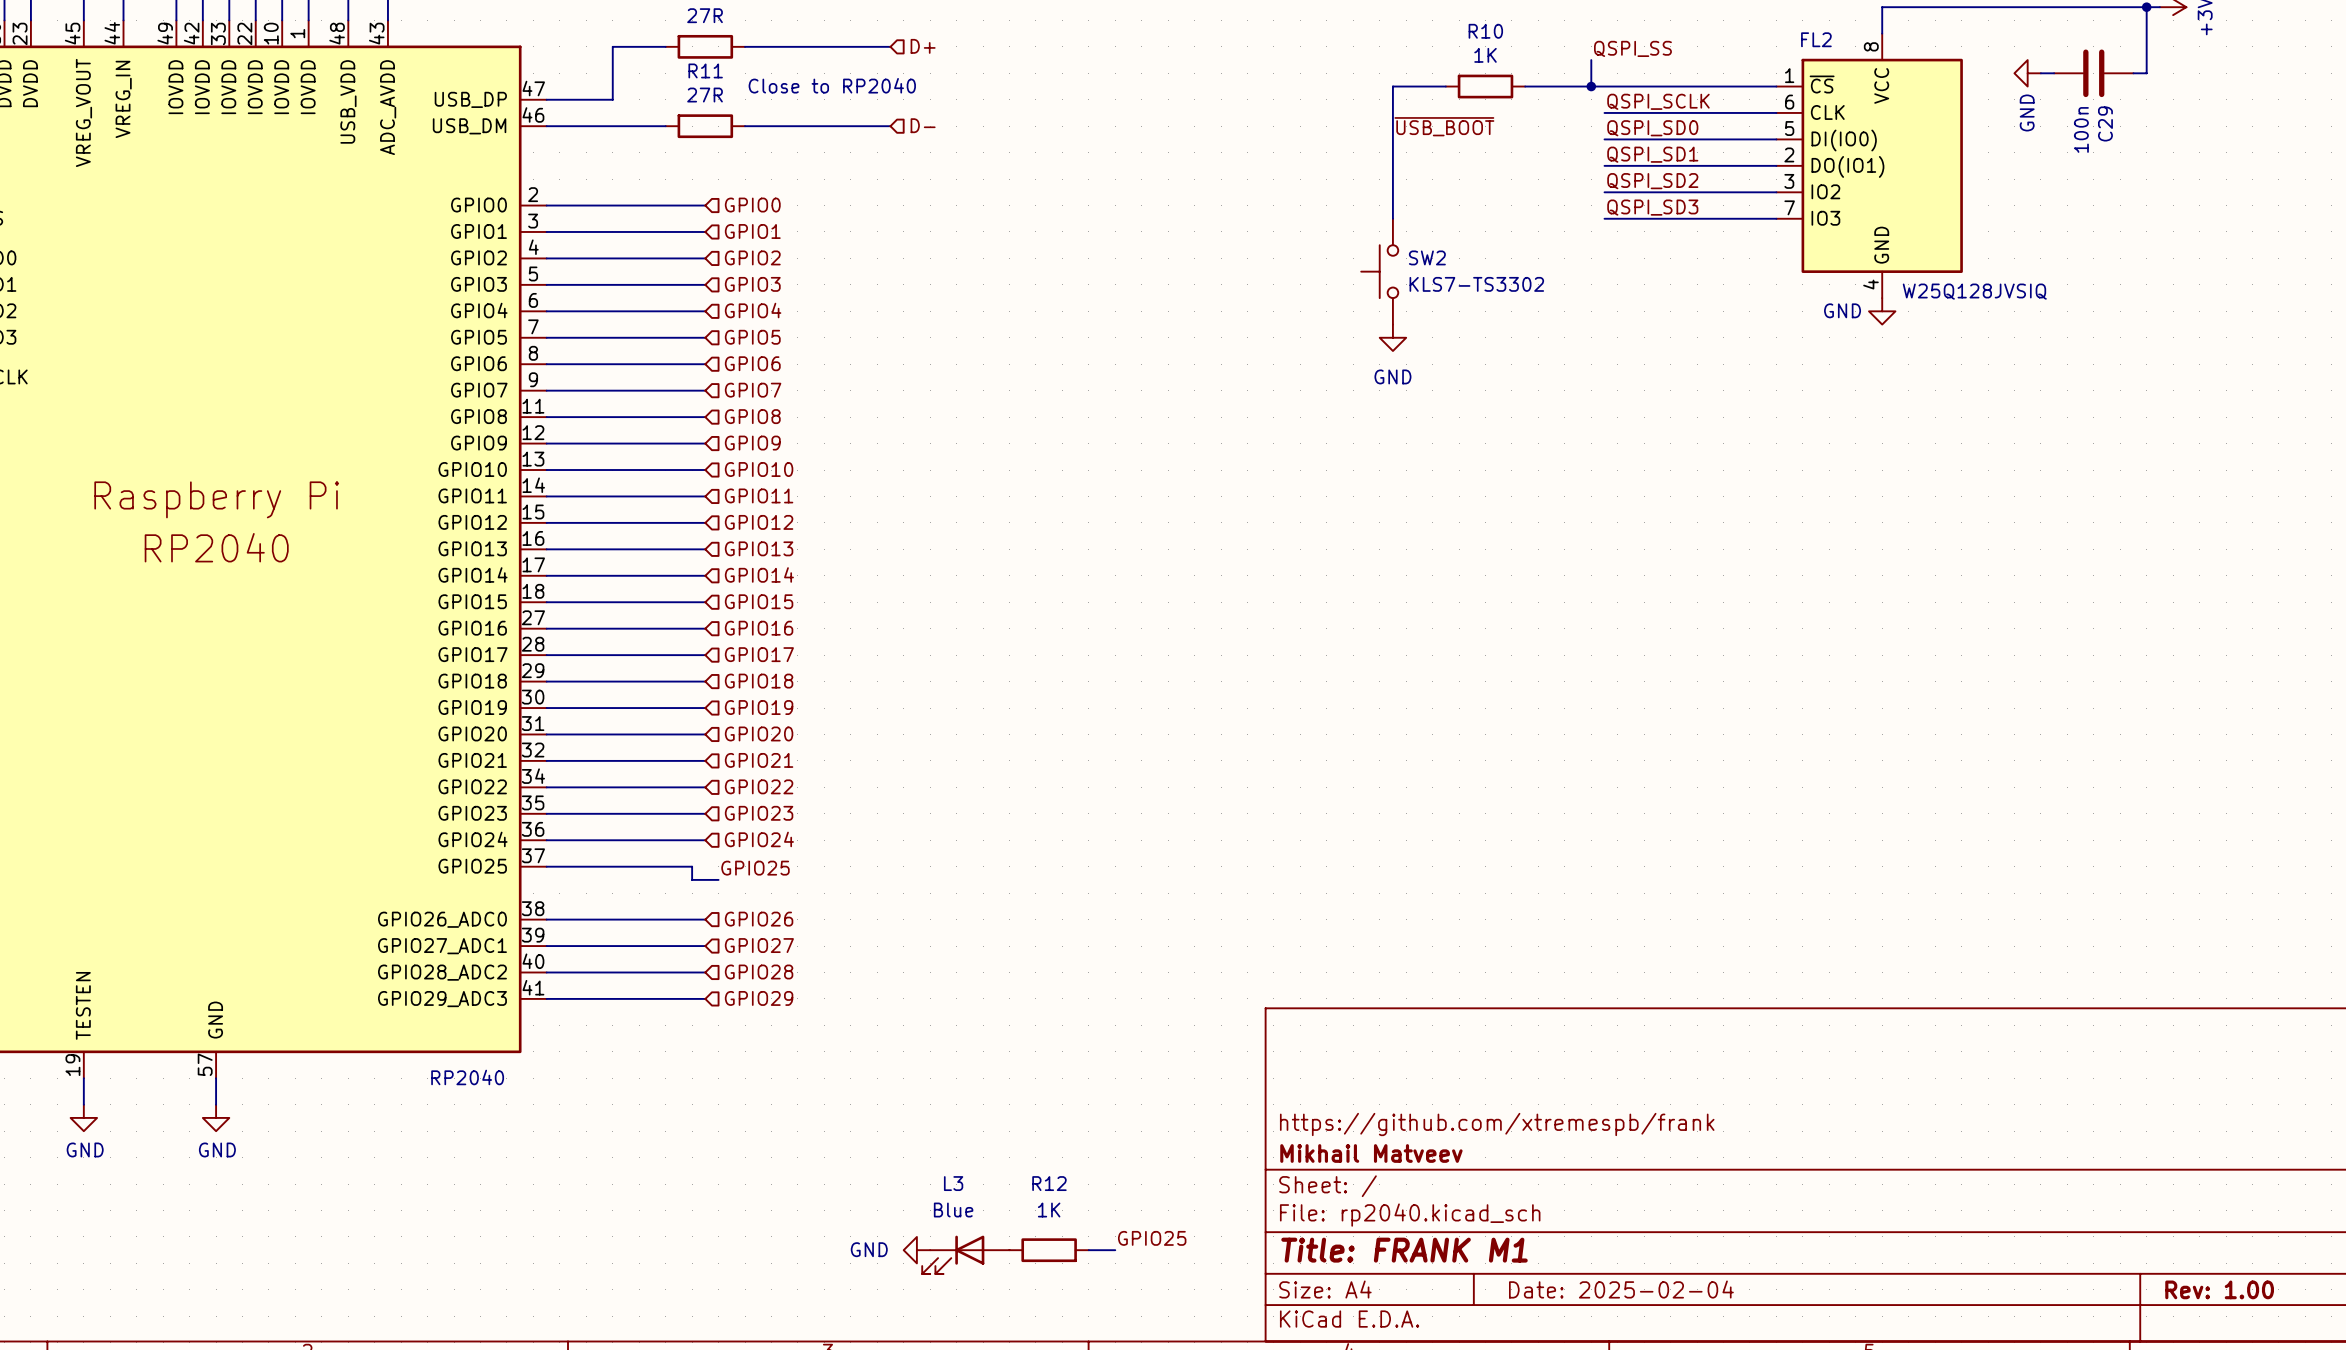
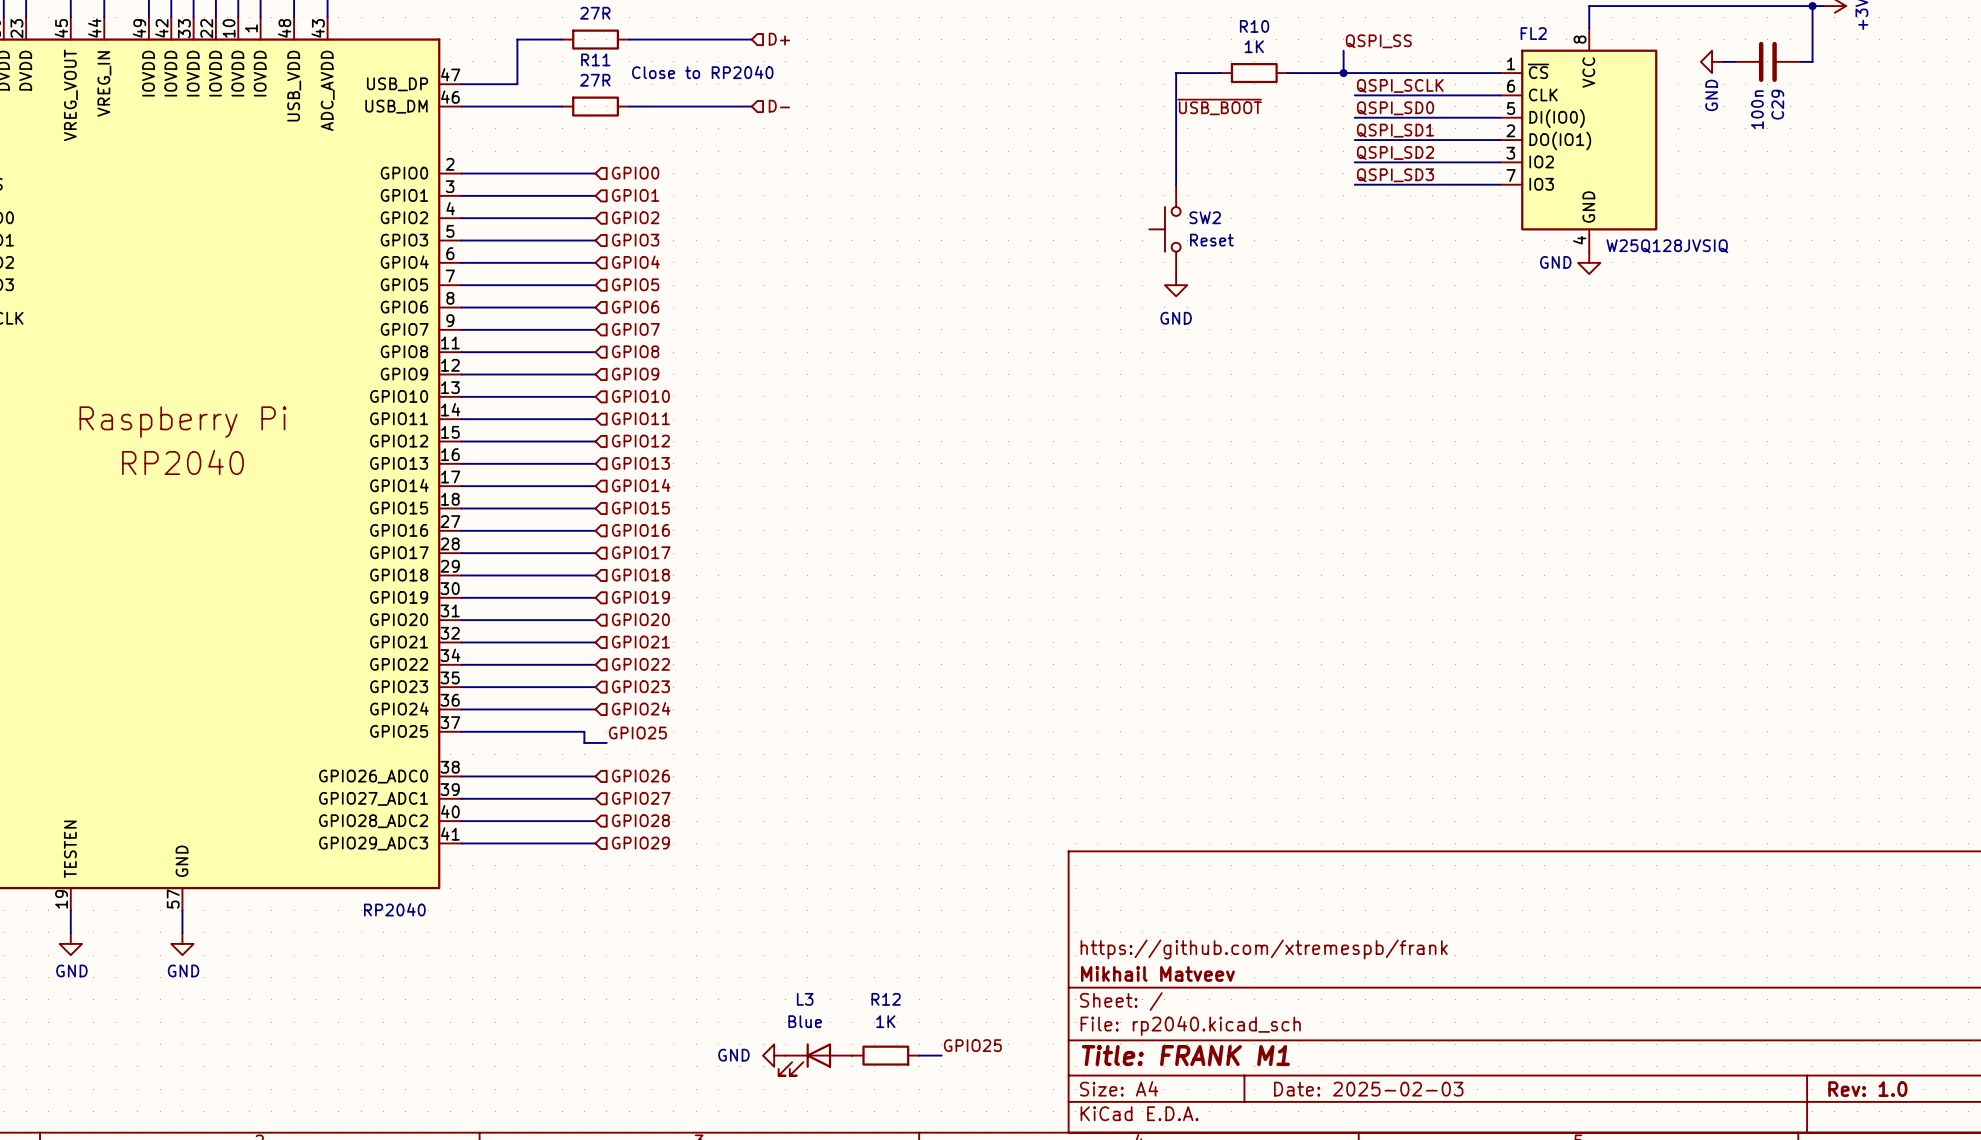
SW2 value: KLS7-TS3302 (1476, 284) -> Reset (1211, 240)
title block: Date: 2025-02-04 (1621, 1289) -> Date: 2025-02-03 (1368, 1089)
title block: Rev: 1.00 (2219, 1289) -> Rev: 1.0 (1867, 1089)

